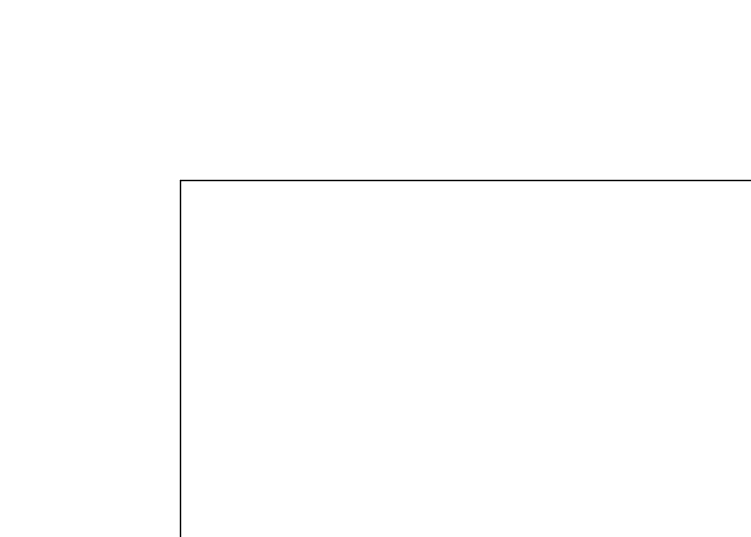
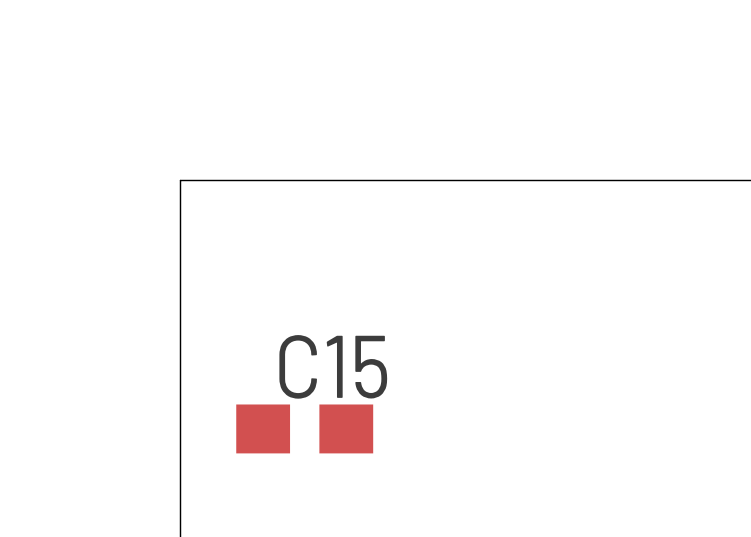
C15: none -> (304, 428)

